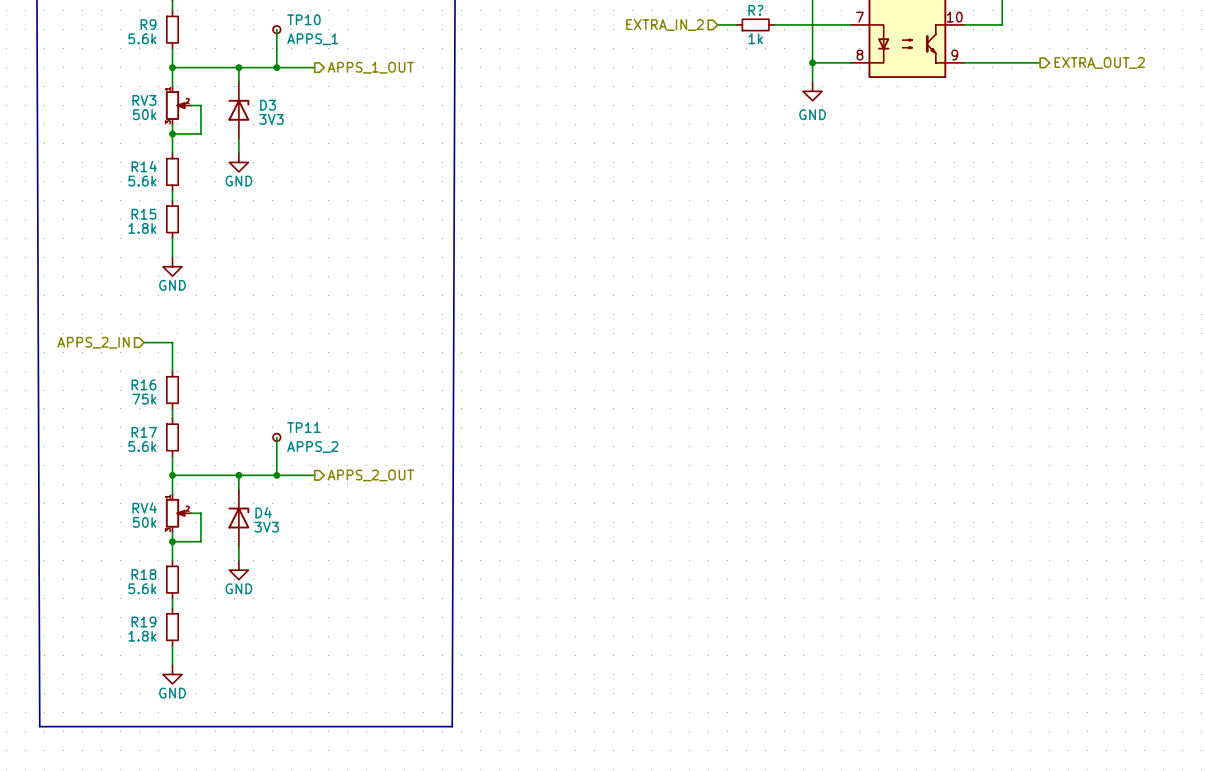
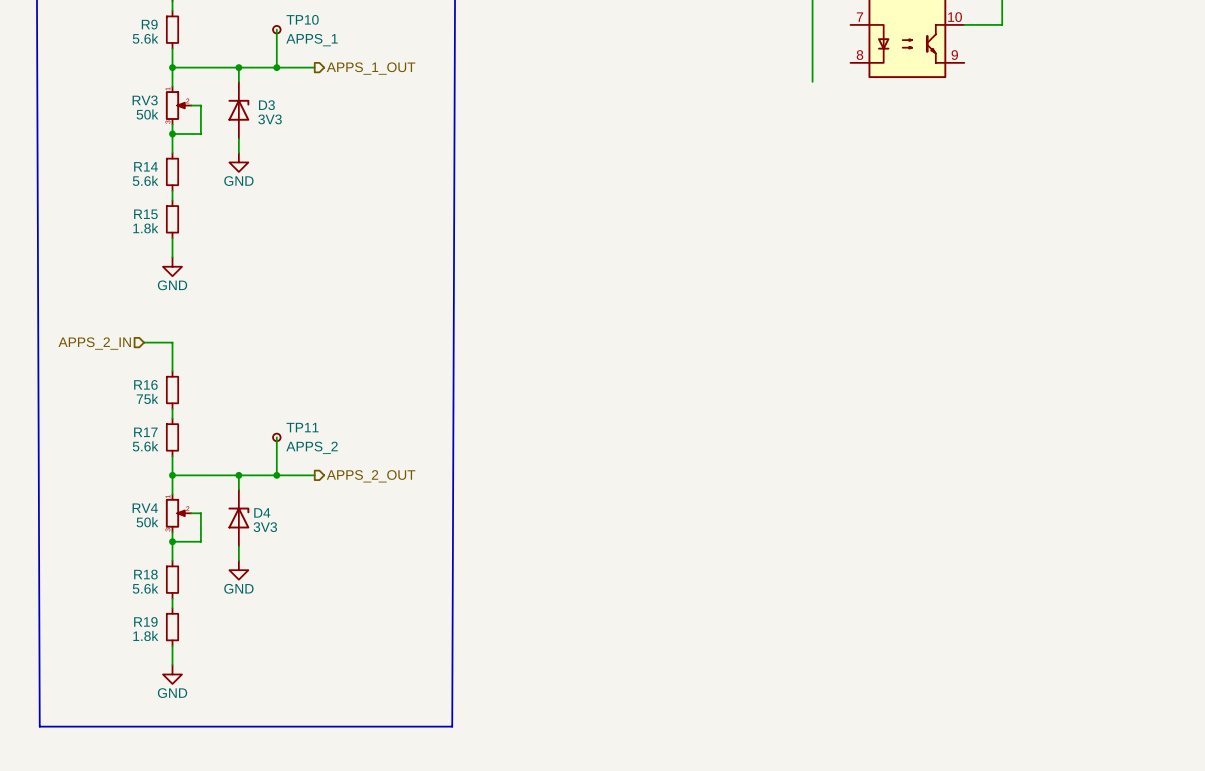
wire: (717, 24) (736, 24) -> none
R?: 1k (755, 24) -> none
wire: (774, 24) (850, 24) -> none
hierarchical label: EXTRA_IN_2 (664, 25) -> none
wire: (812, 62) (850, 62) -> none
junction: (812, 62) -> none
wire: (964, 62) (1040, 62) -> none
hierarchical label: EXTRA_OUT_2 (1099, 62) -> none
power symbol: GND (812, 91) -> none

